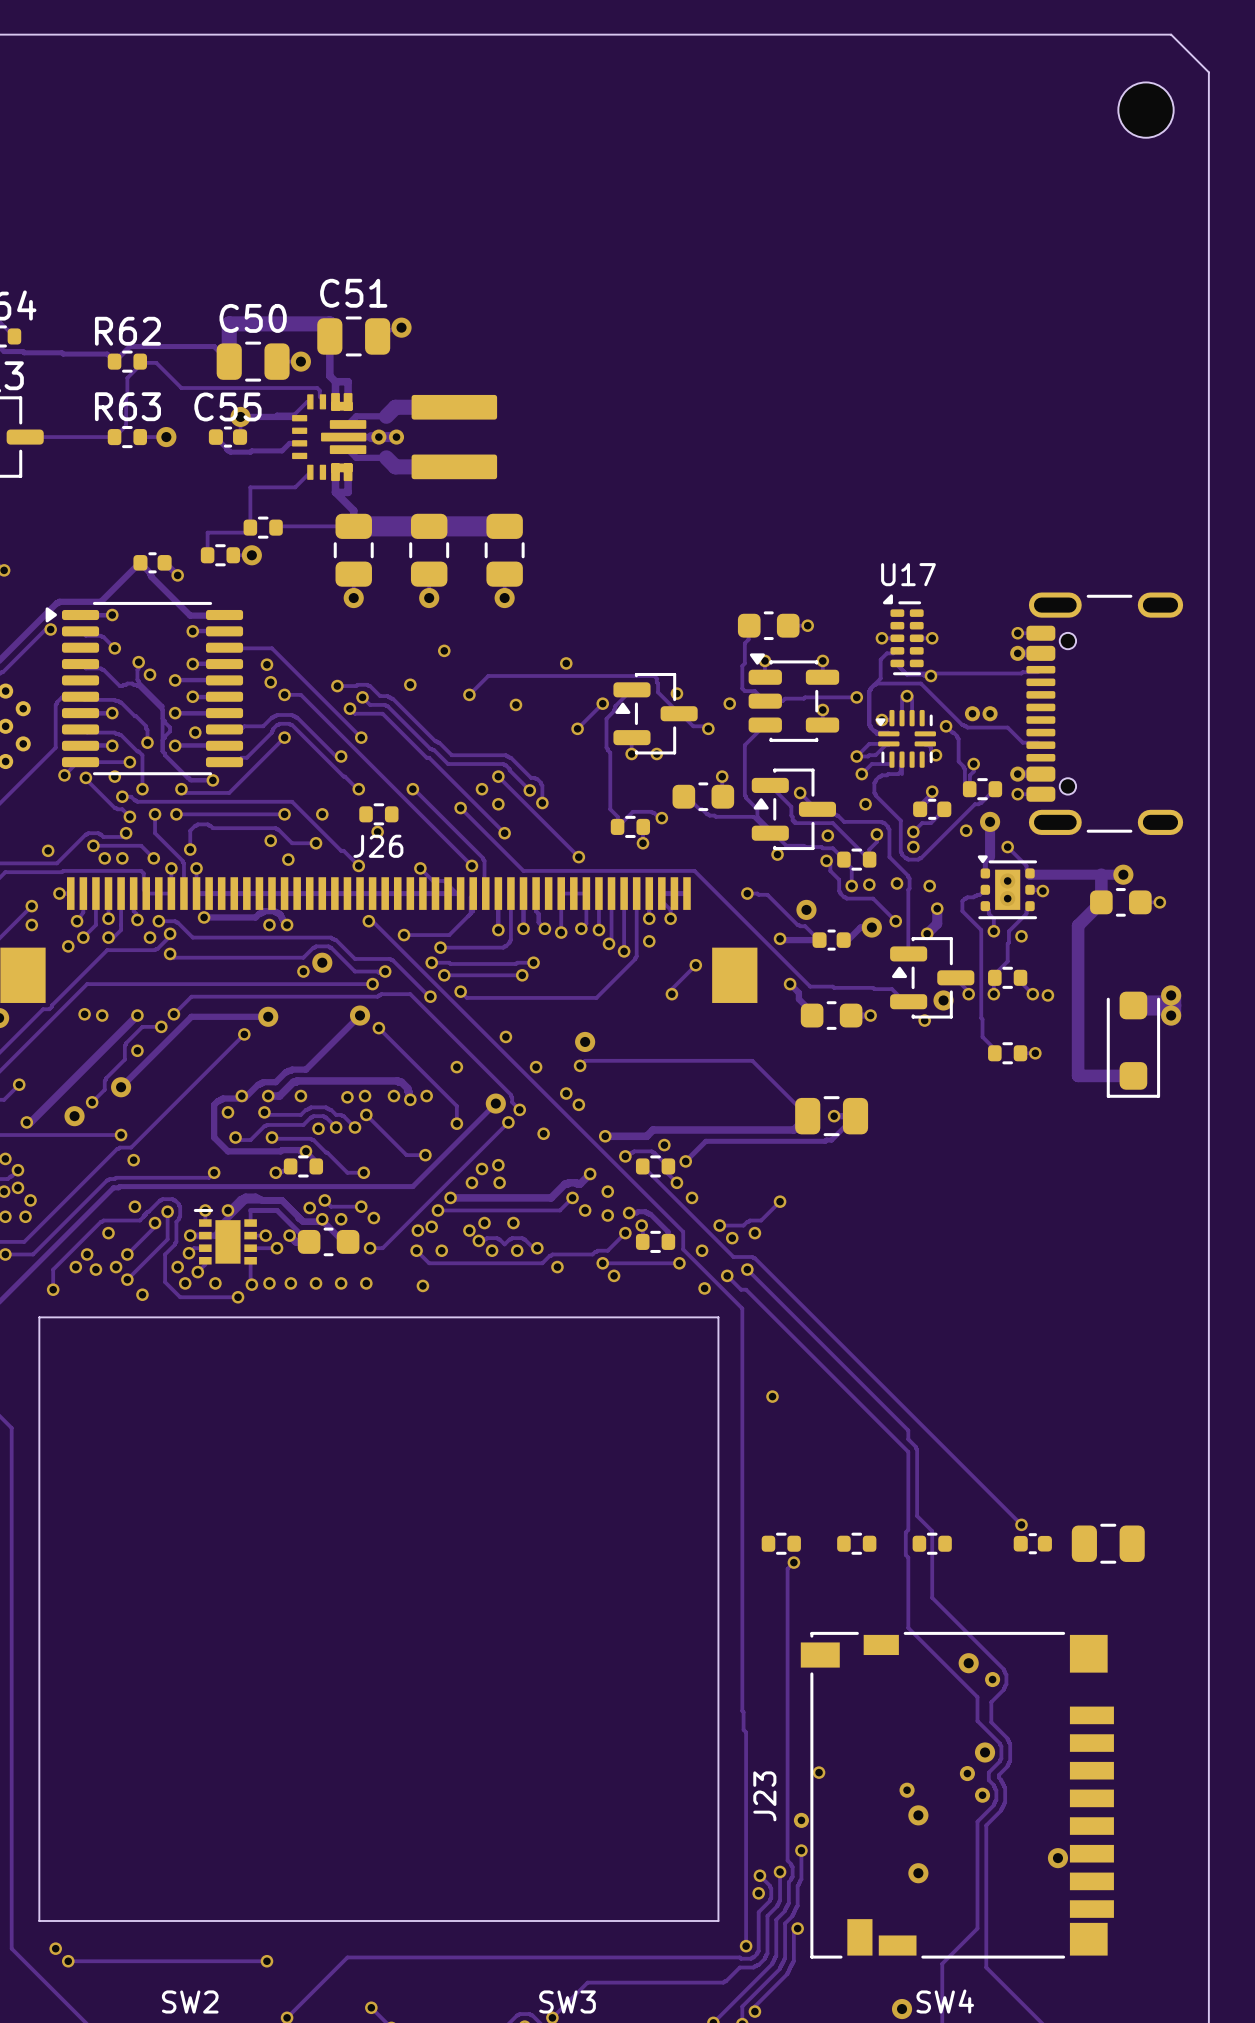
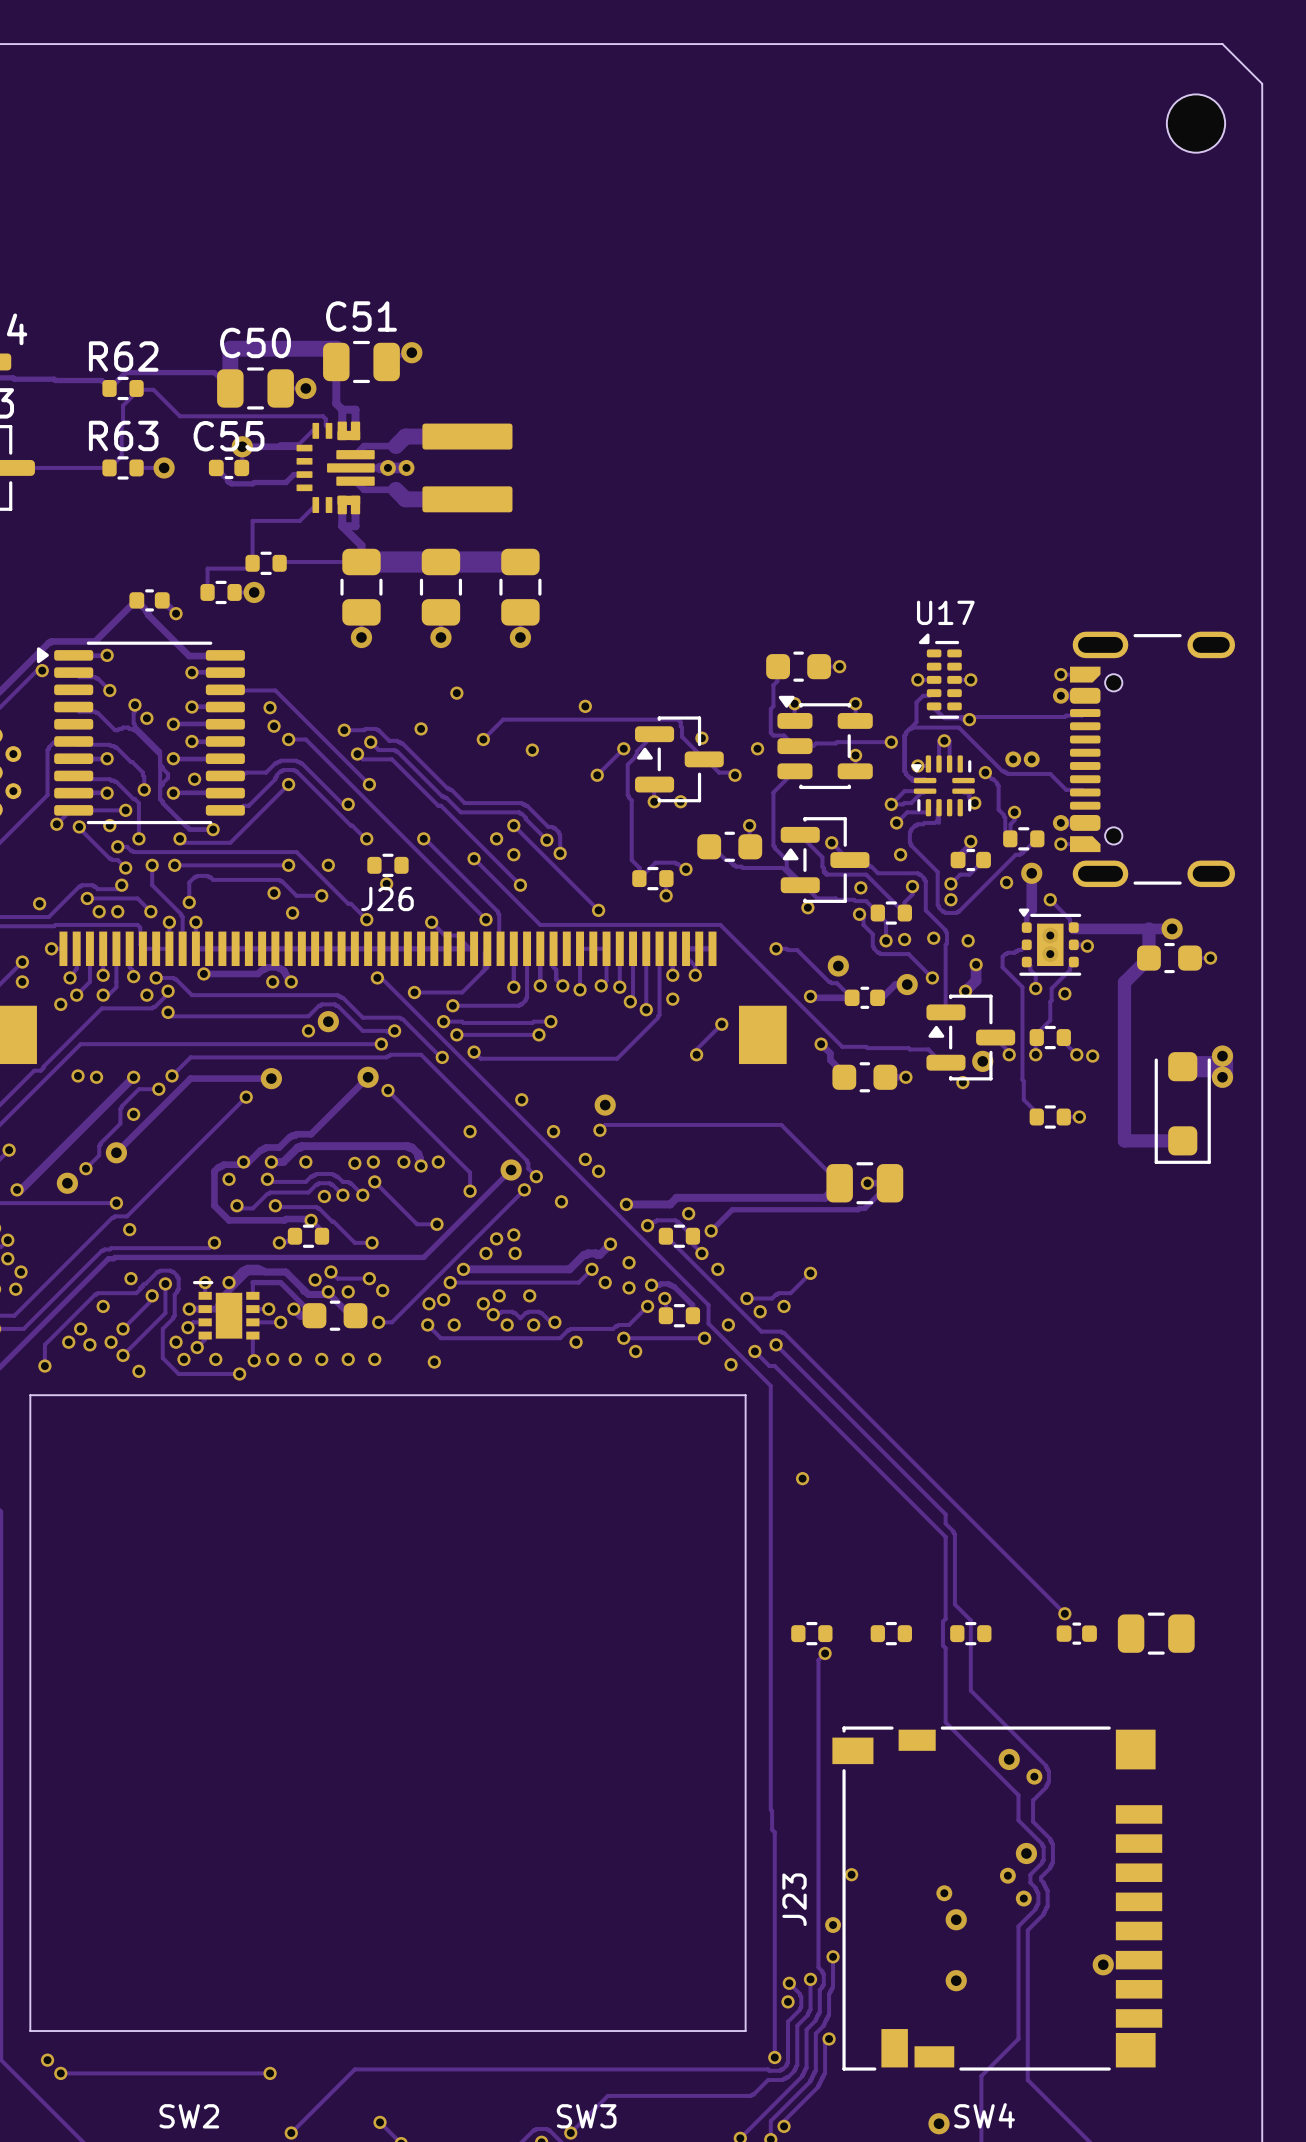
part footprint: [1026, 592, 1184, 835] -> [1070, 631, 1236, 888]

